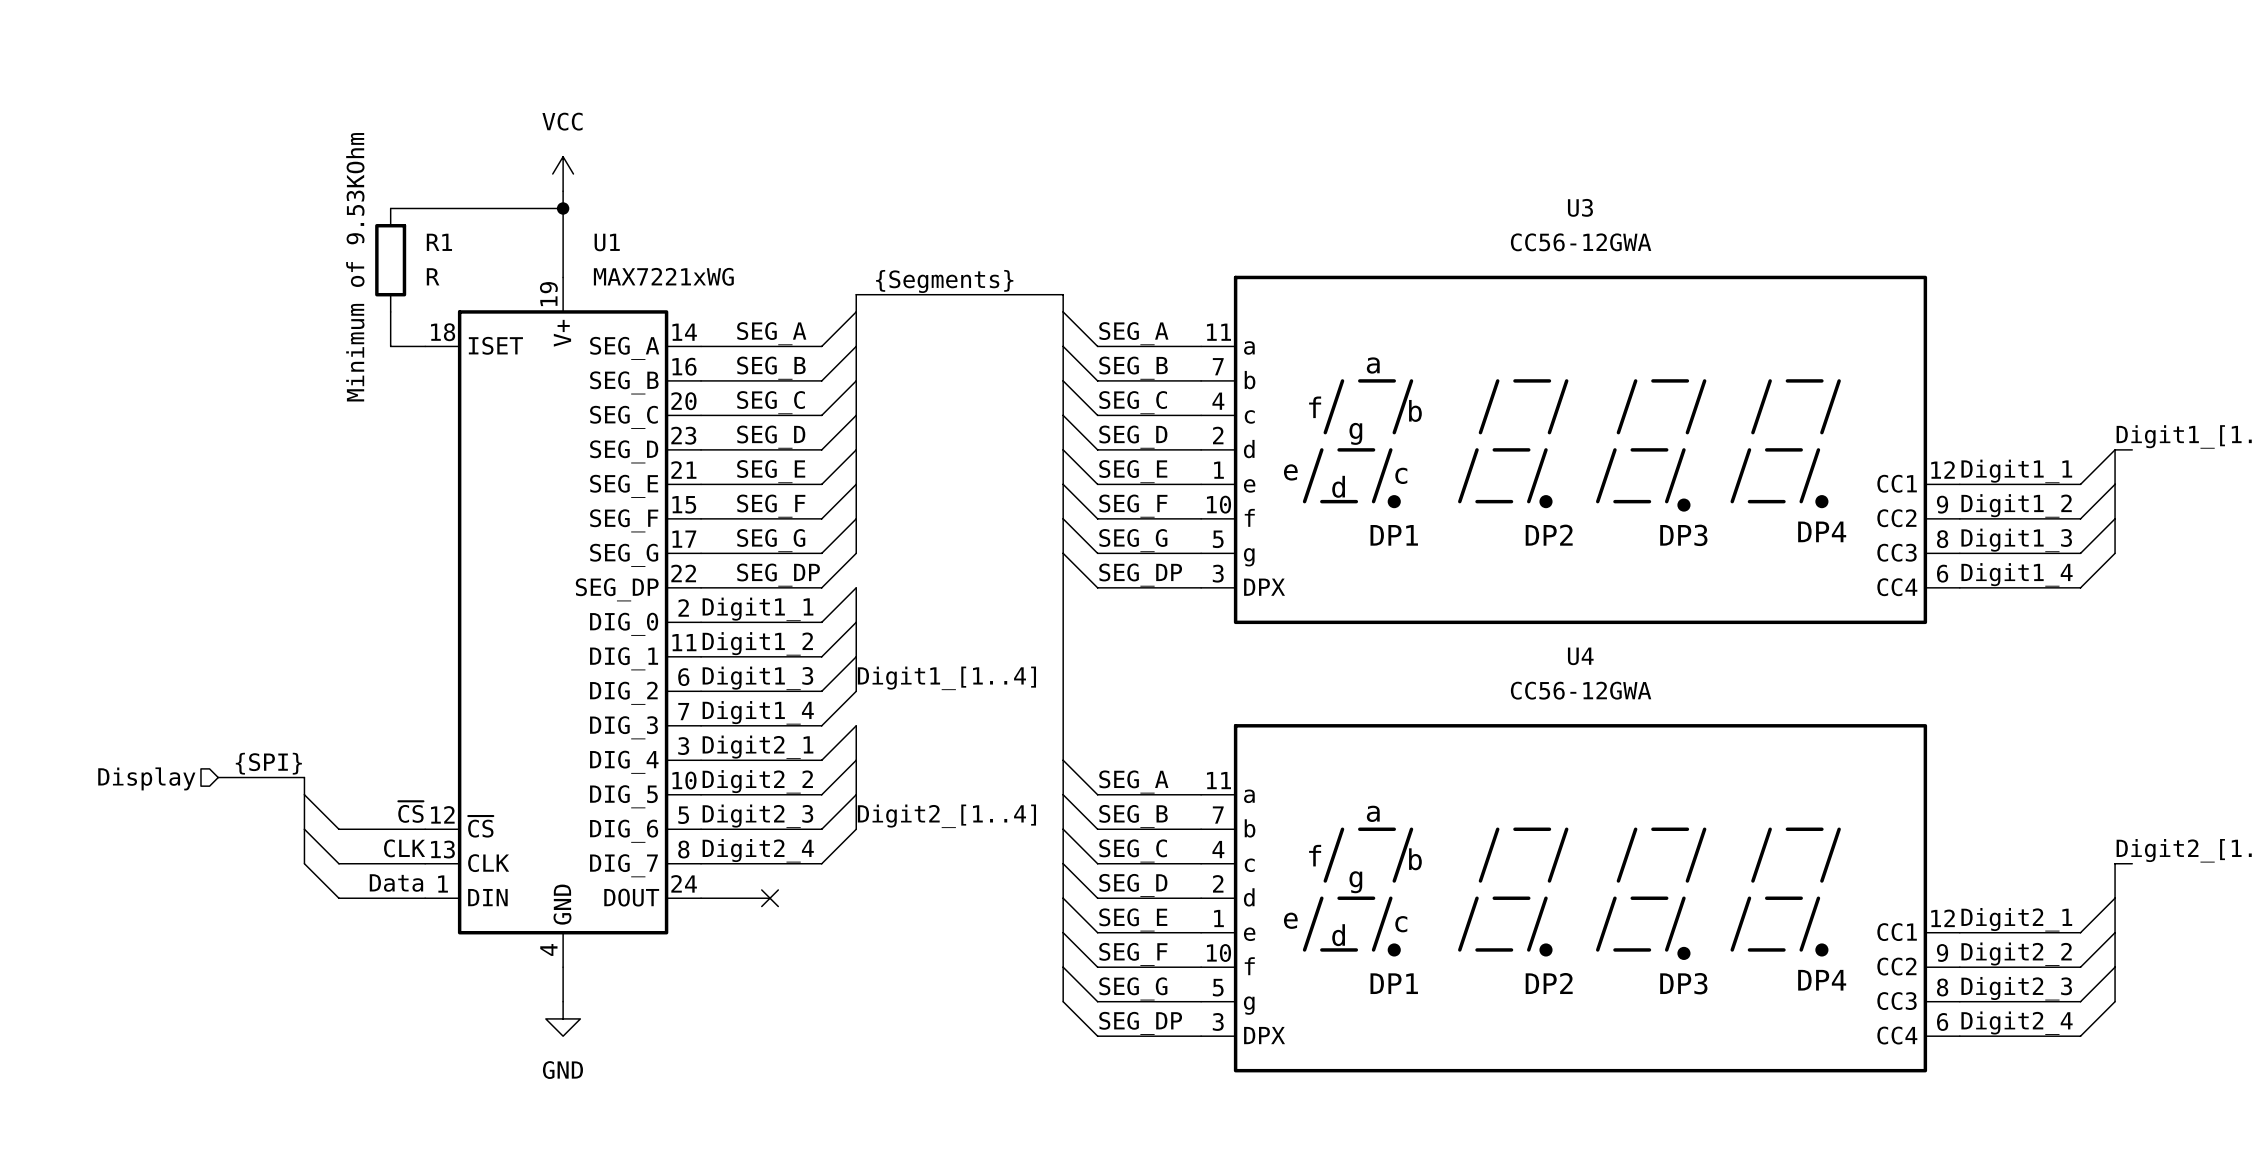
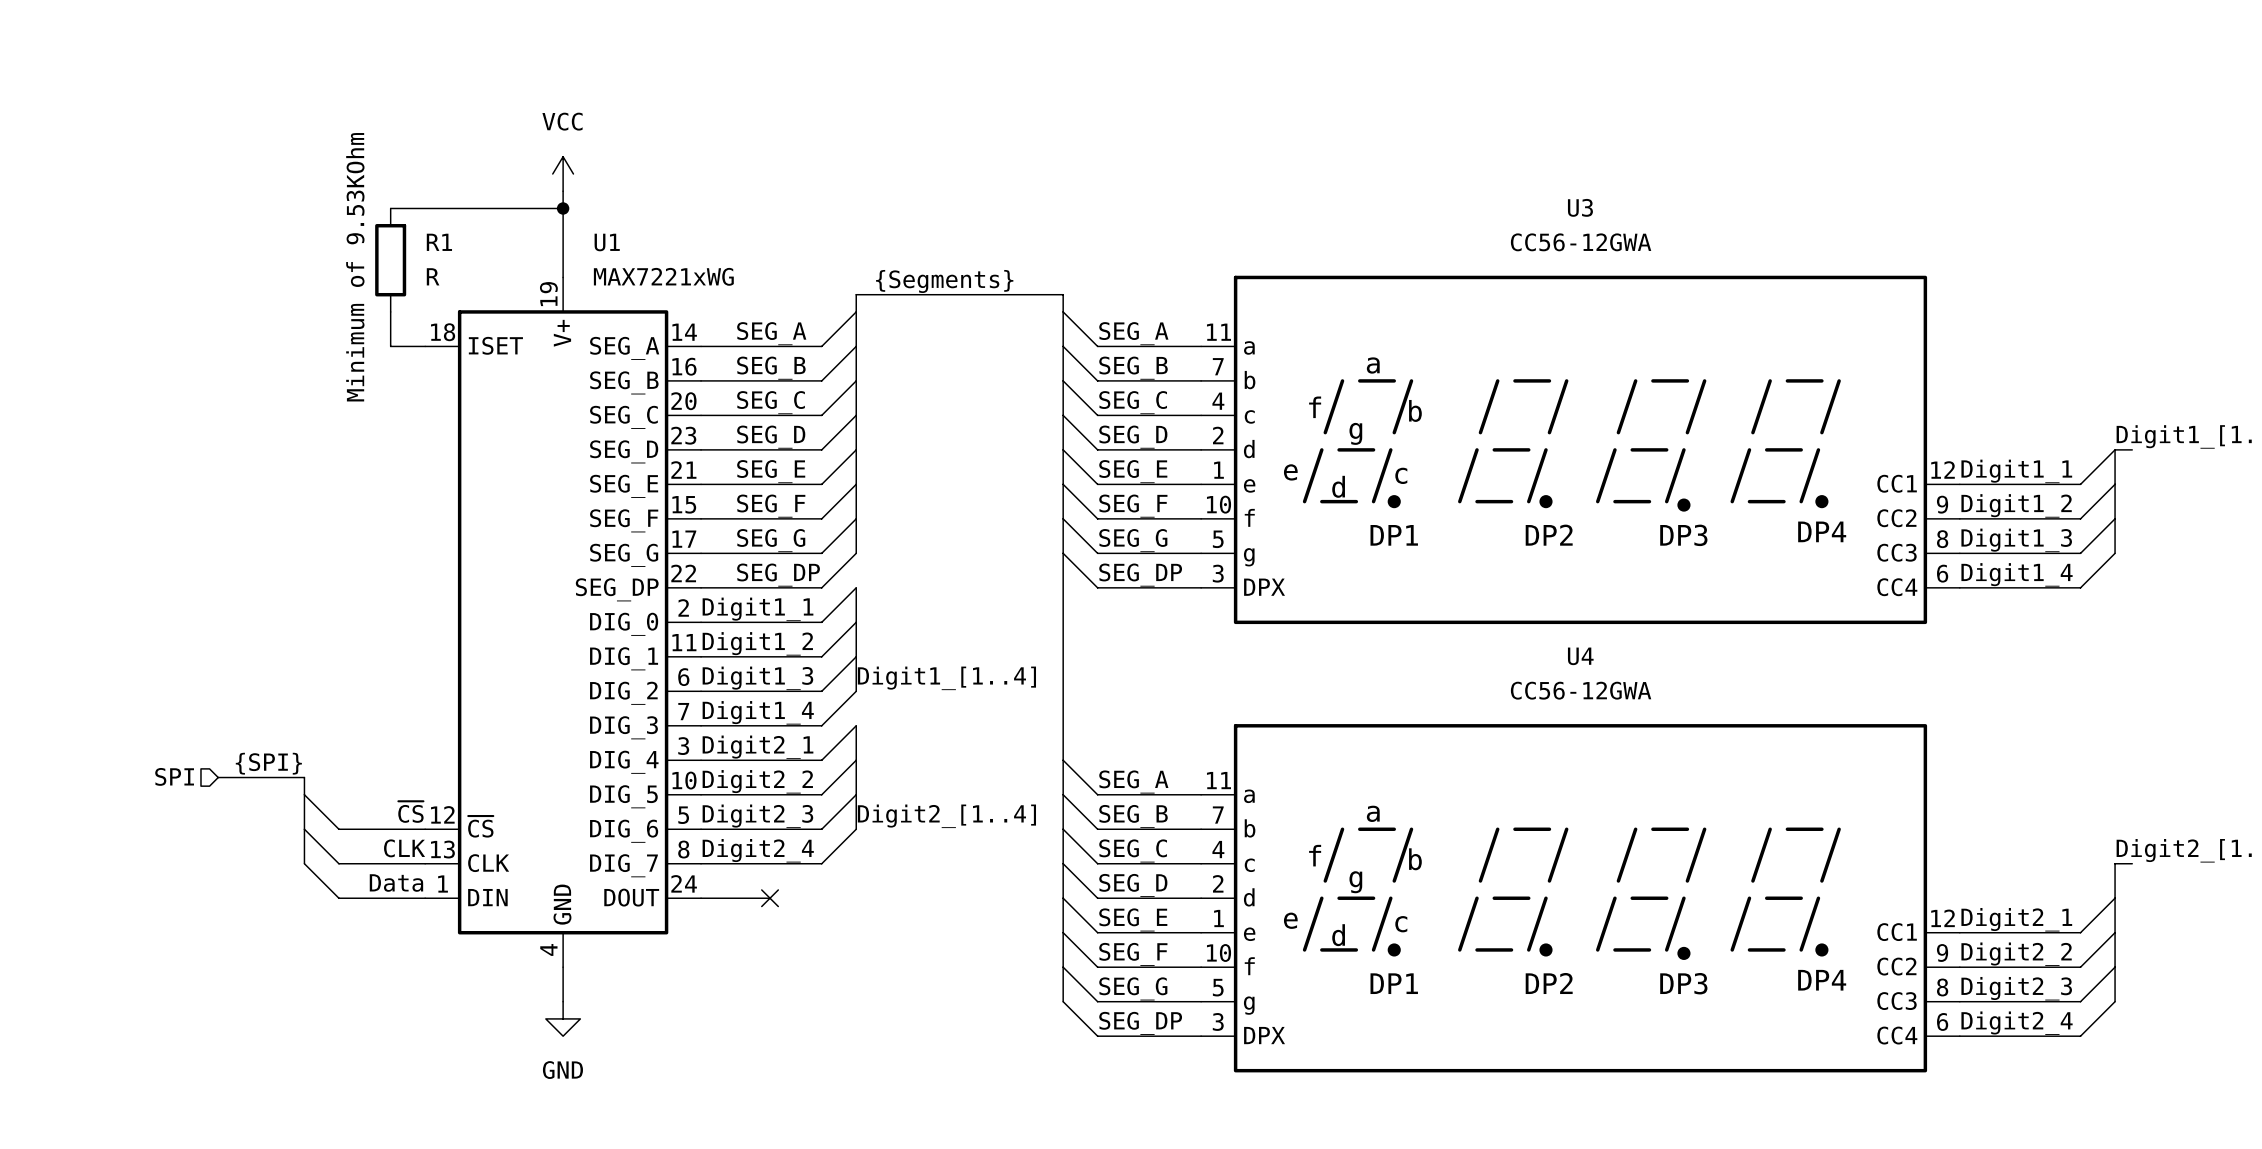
hierarchical label: Display (146, 778) -> SPI (174, 776)

